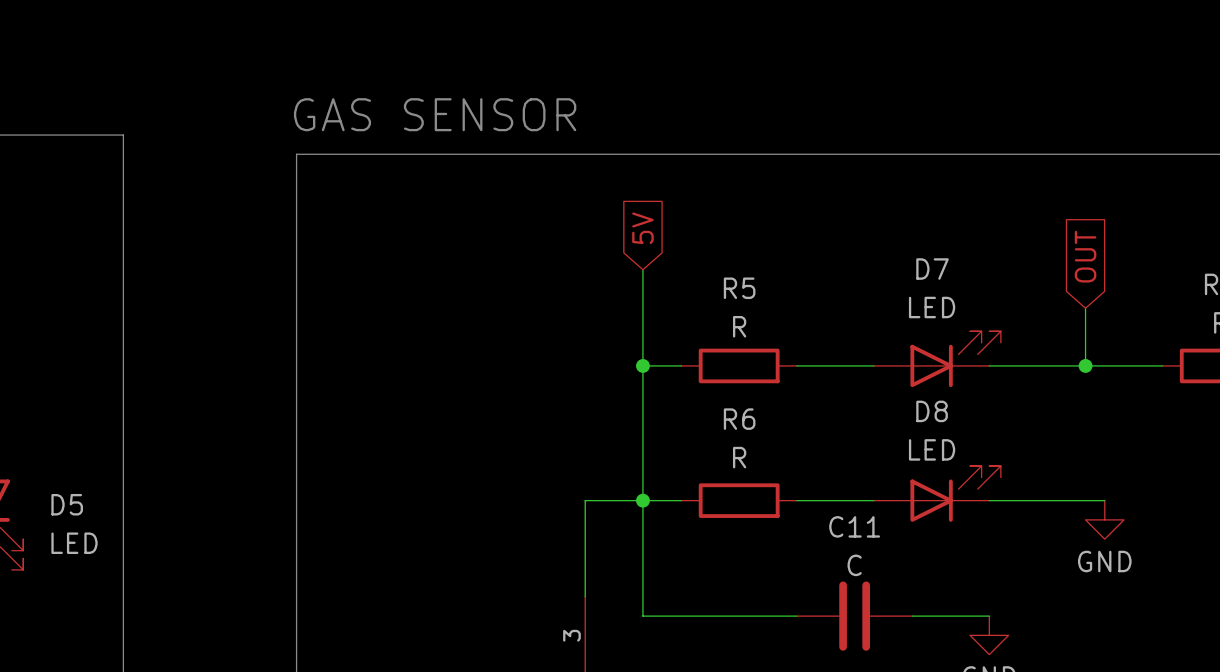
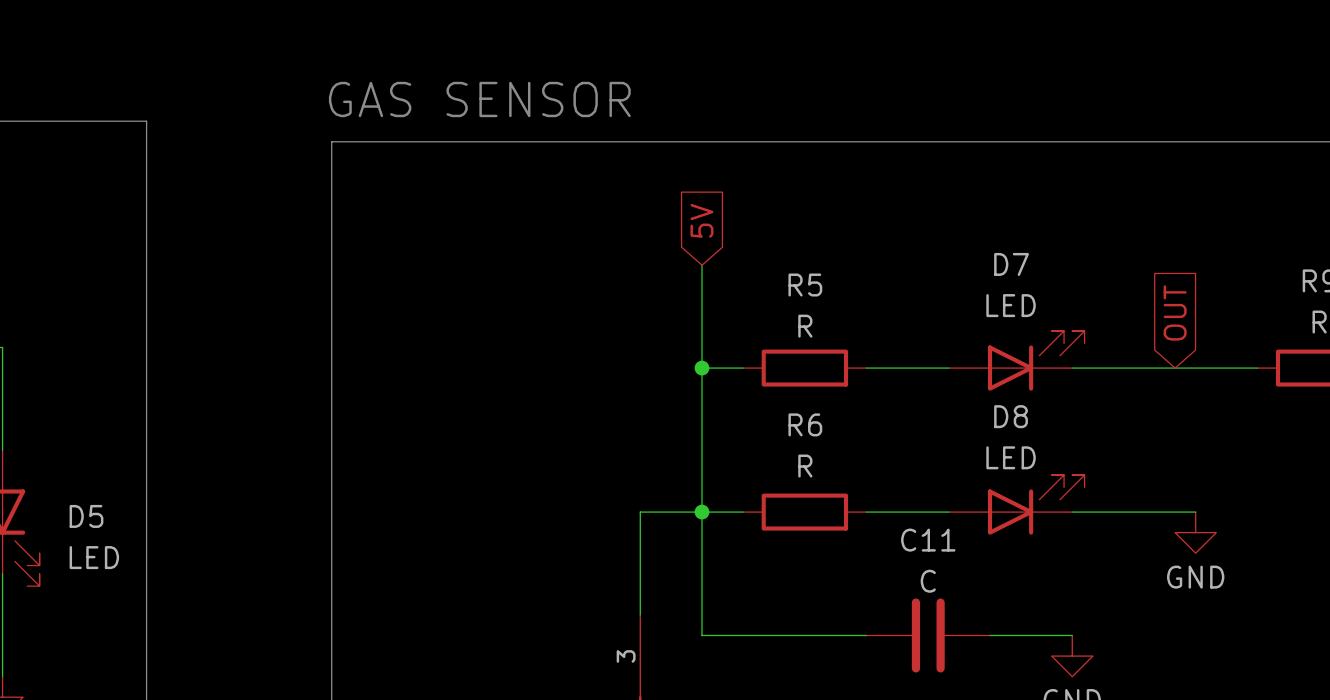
global label position: OUT (1085, 256) -> OUT (1175, 312)
wire: (1085, 308) (1085, 365) -> none
junction: (1085, 365) -> none

